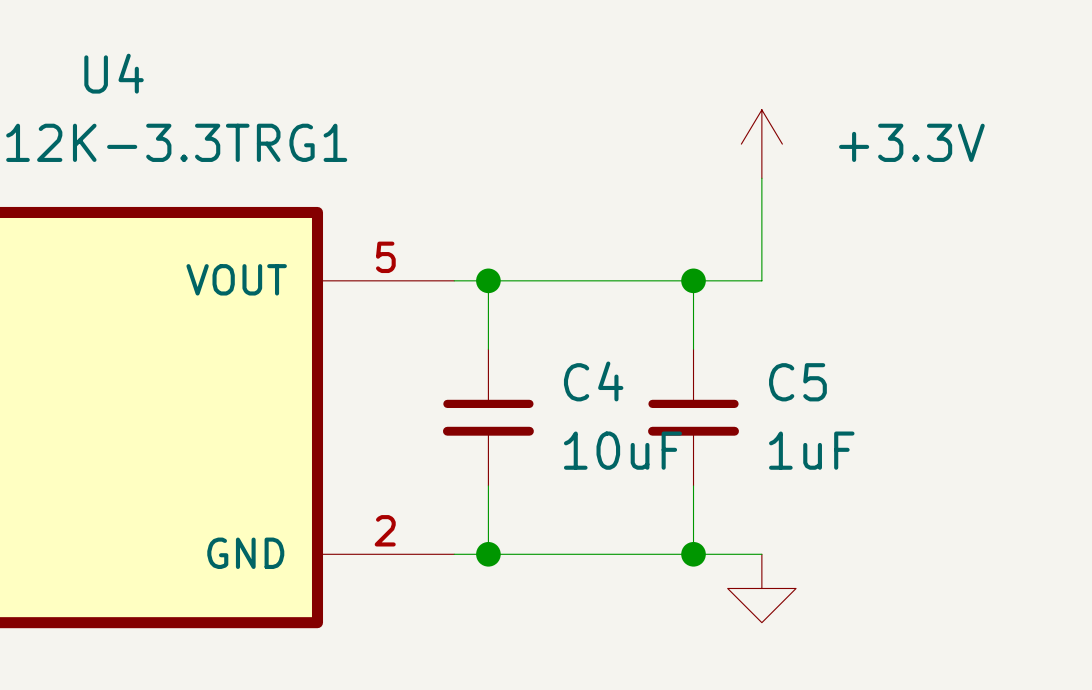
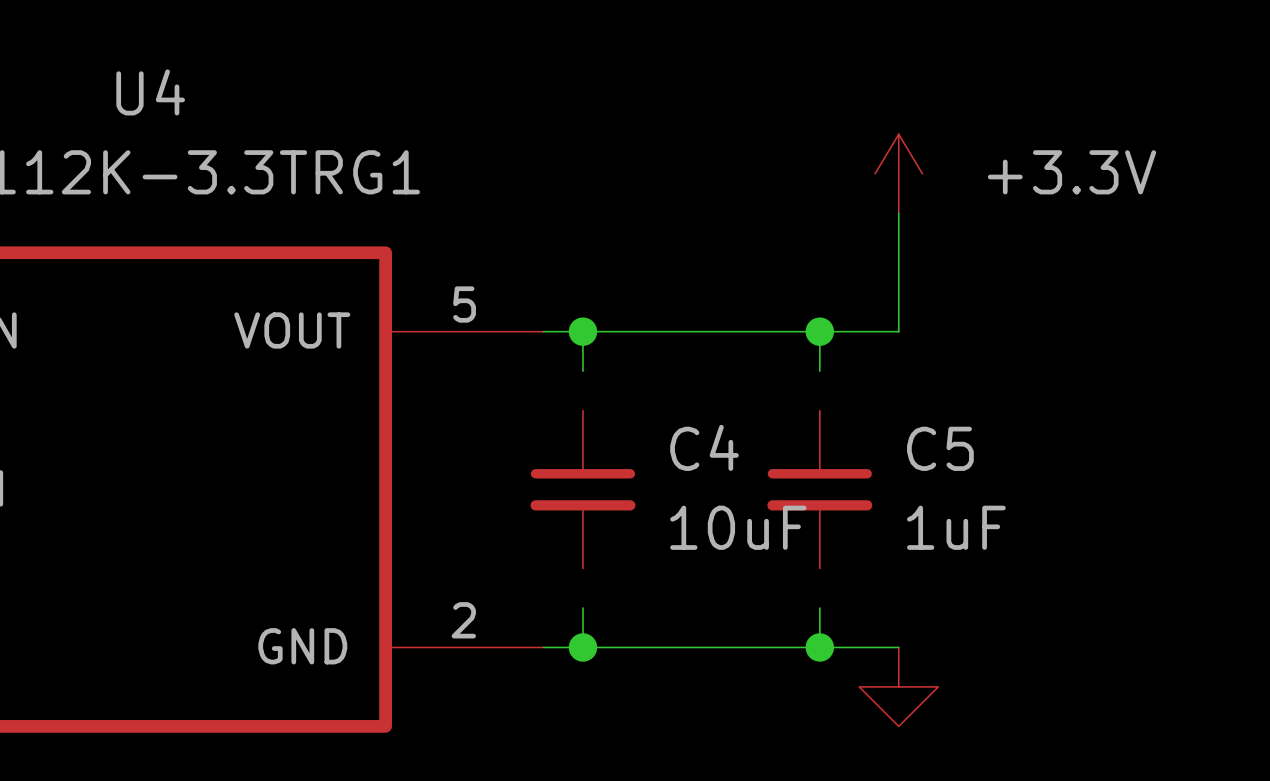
wire: (488, 315) (488, 349) -> none
wire: (693, 315) (693, 349) -> none
wire: (488, 485) (488, 520) -> none
wire: (693, 485) (693, 520) -> none

